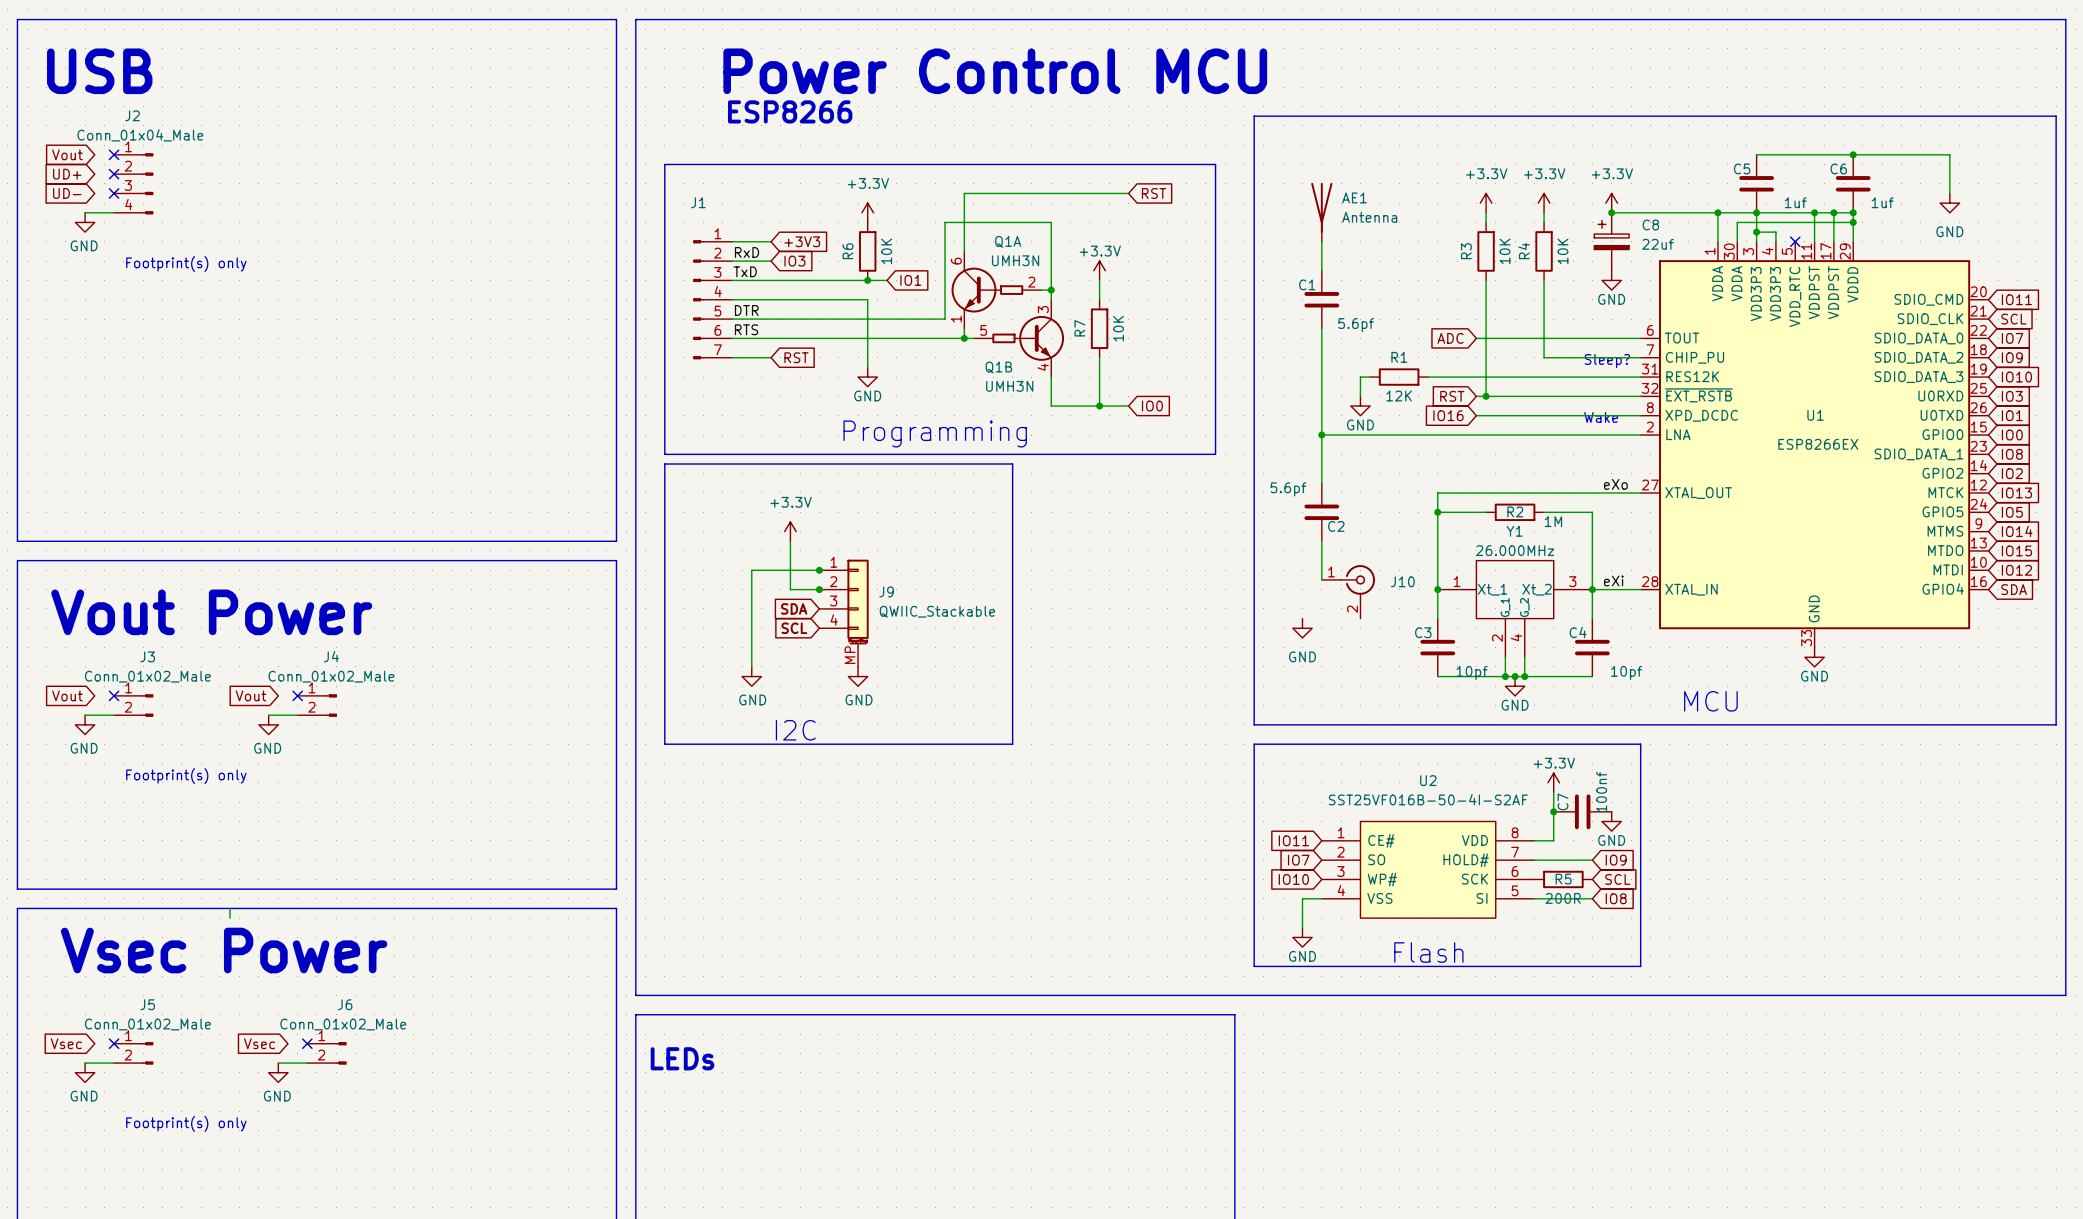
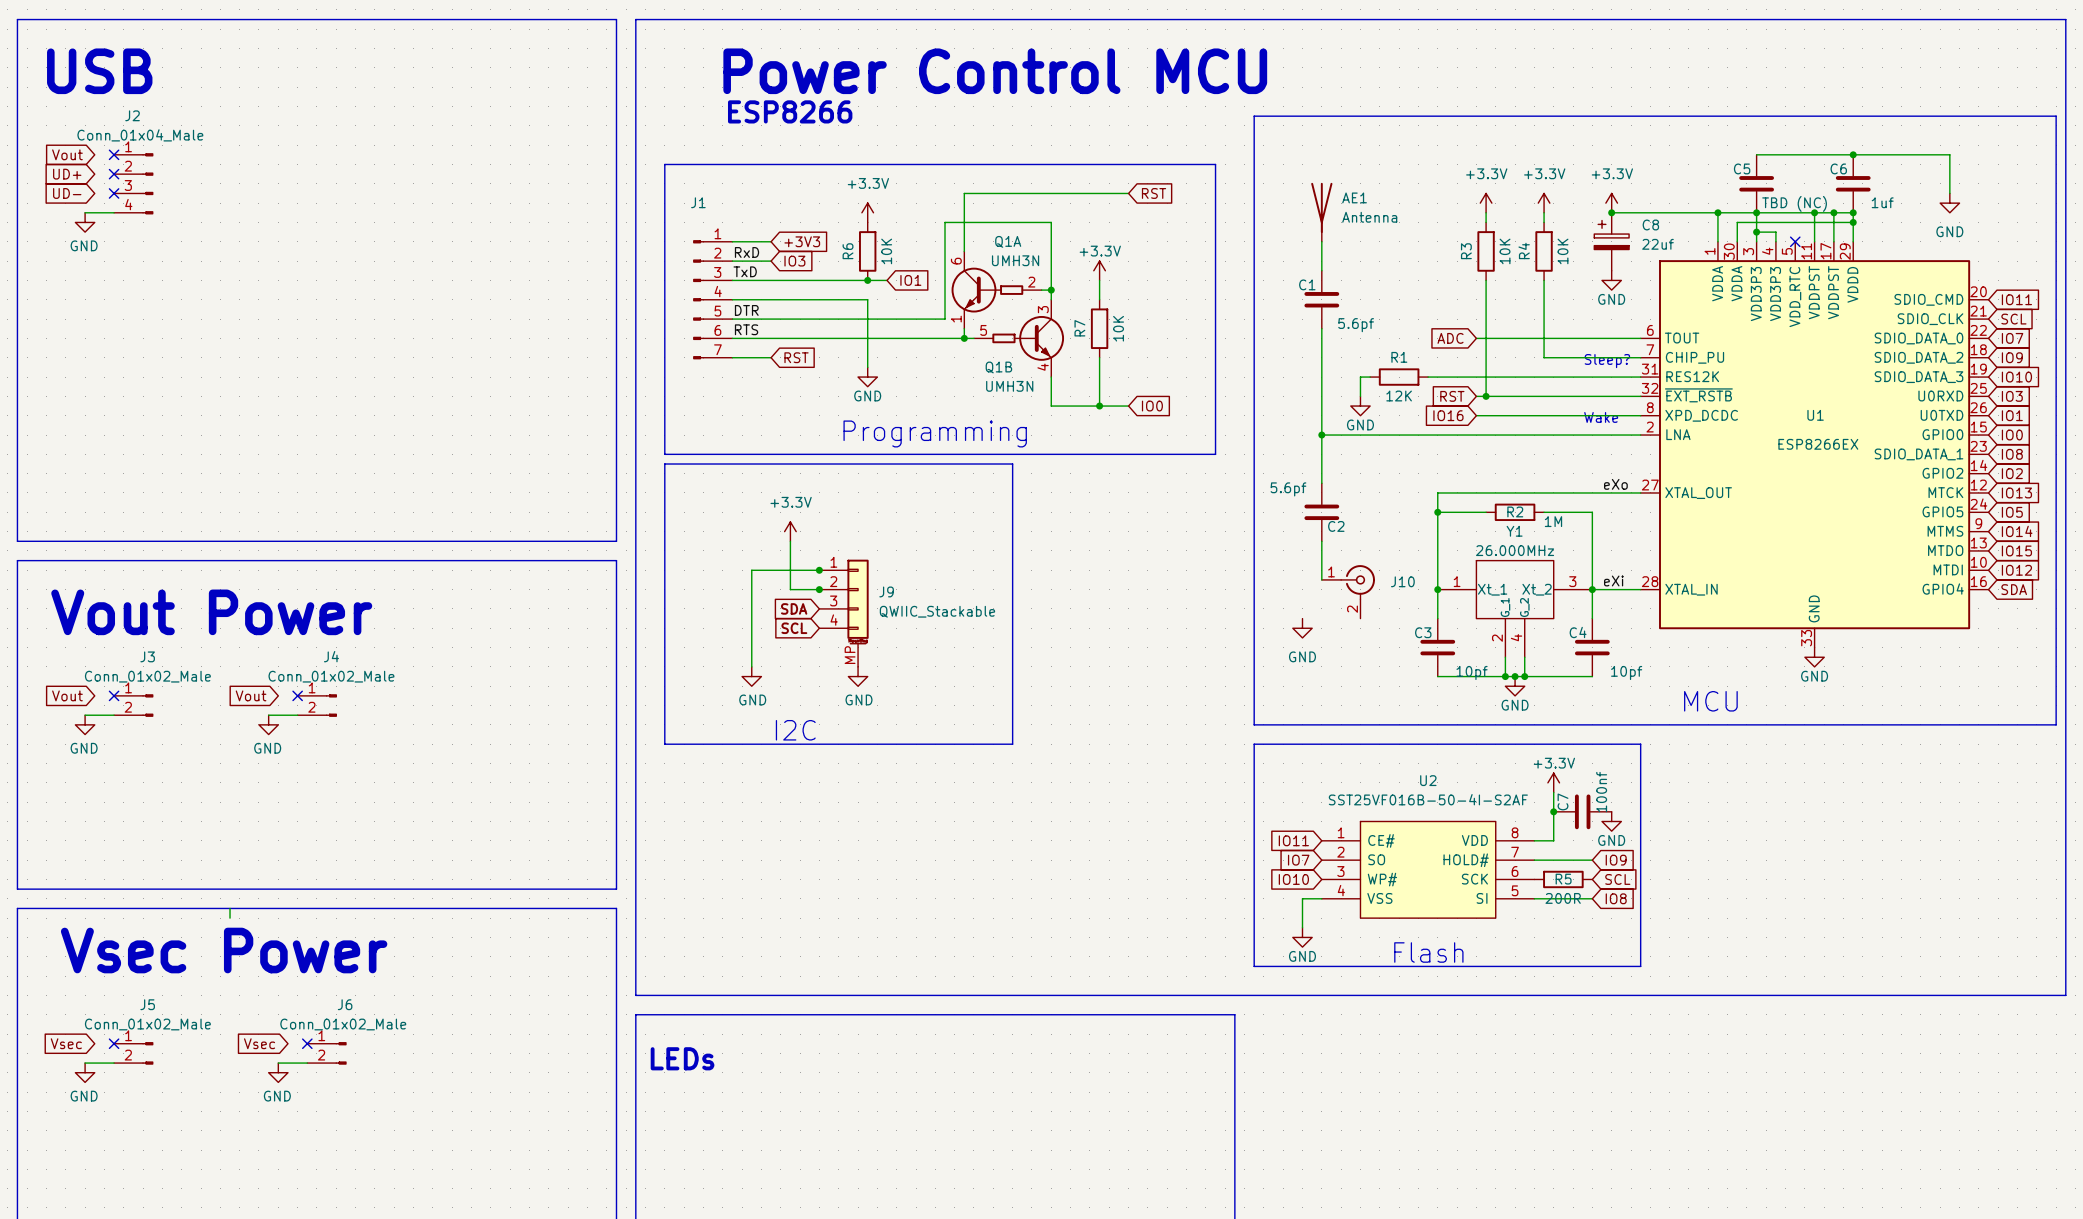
C5 value: 1uf (1795, 202) -> TBD (NC) (1794, 203)
text: Footprint(s) only (186, 264) -> none
text: Footprint(s) only (186, 776) -> none
text: Footprint(s) only (186, 1123) -> none

